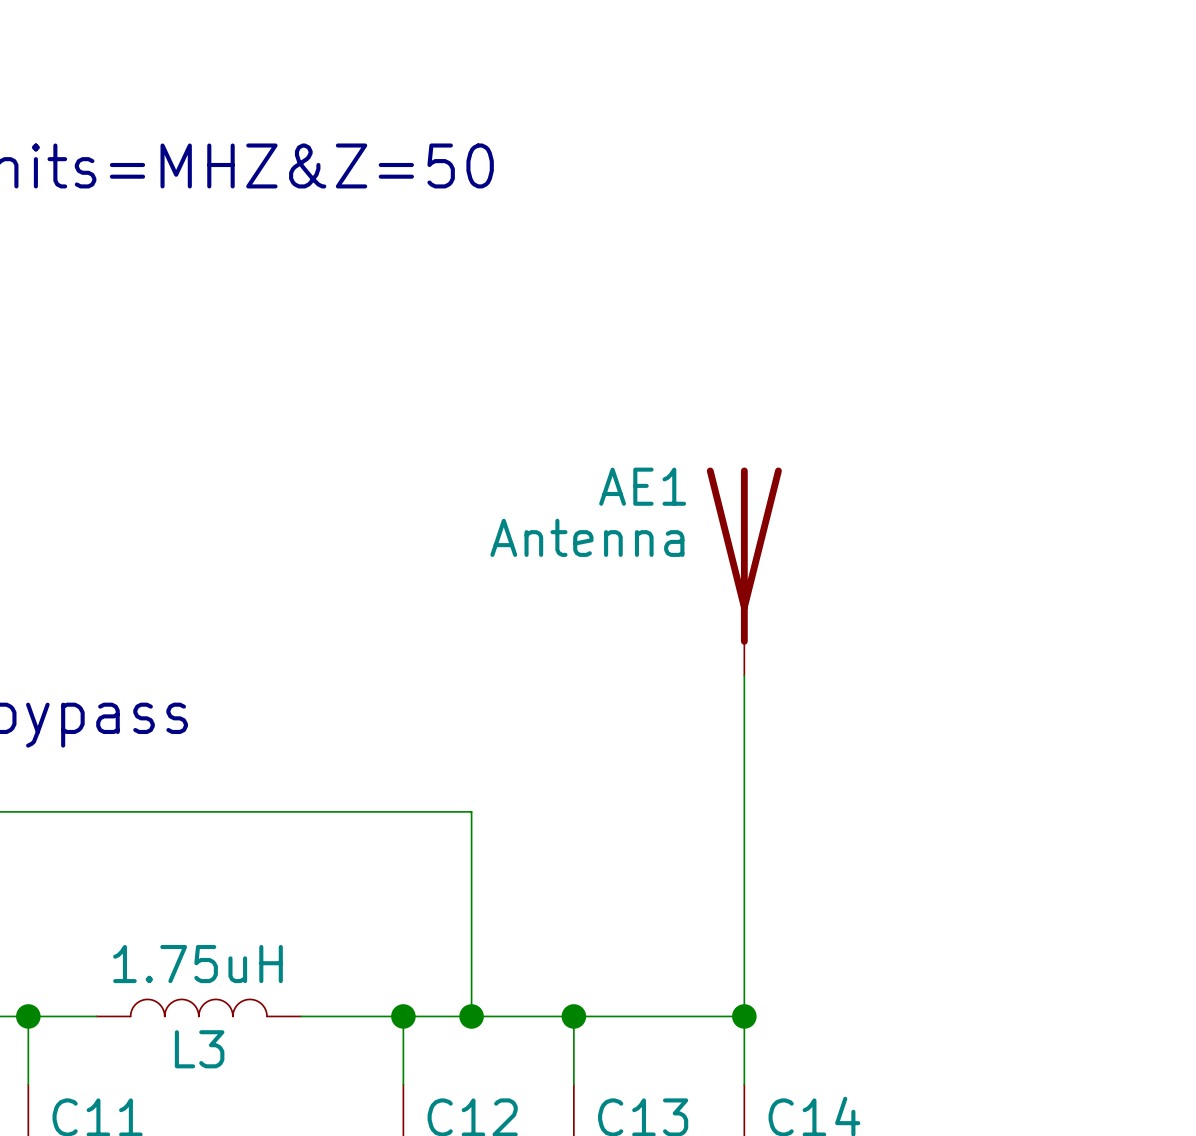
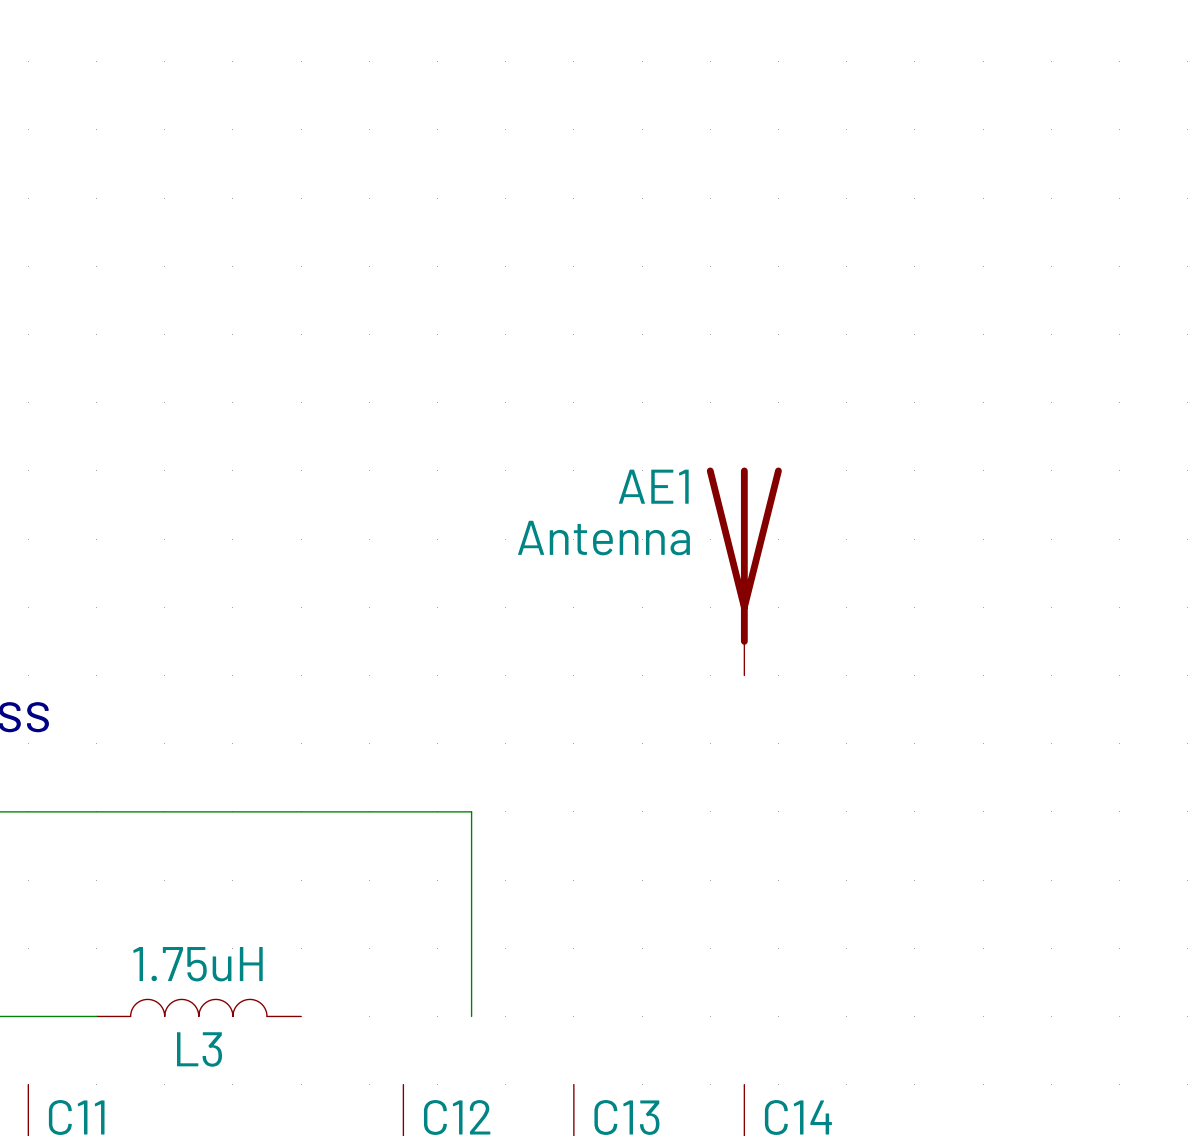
wire: (744, 675) (744, 1084) -> none
wire: (28, 1016) (28, 1084) -> none
junction: (28, 1016) -> none
wire: (301, 1016) (744, 1016) -> none
wire: (403, 1016) (403, 1084) -> none
junction: (403, 1016) -> none
junction: (471, 1016) -> none
wire: (573, 1016) (573, 1084) -> none
junction: (573, 1016) -> none
junction: (744, 1016) -> none

